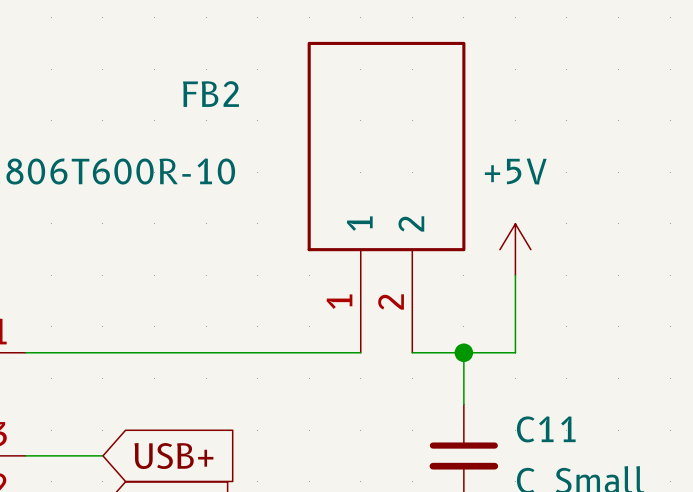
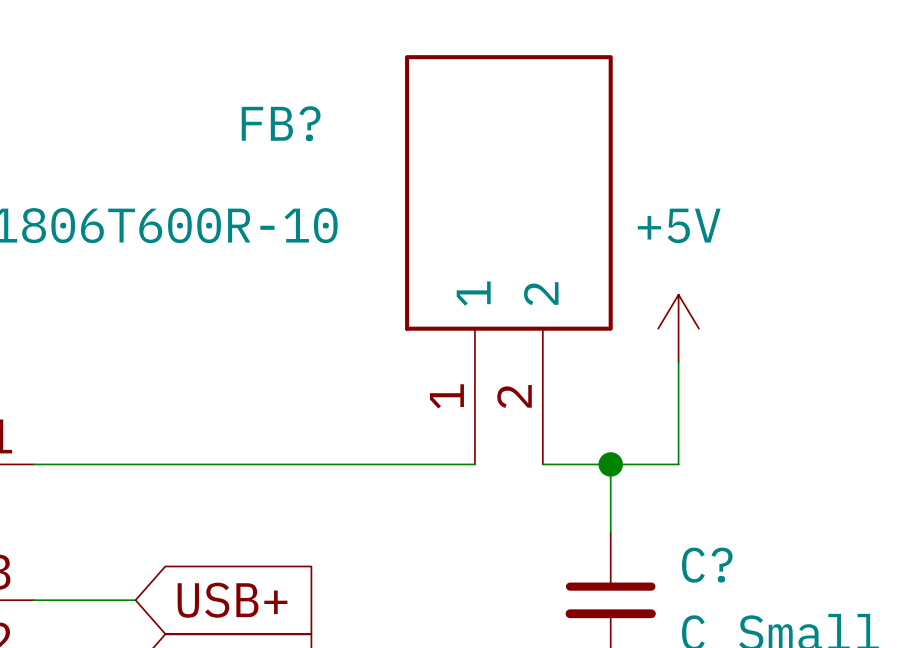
FB2 name: FB2 (210, 94) -> FB? (281, 123)
C11 name: C11 (546, 429) -> C? (707, 565)

